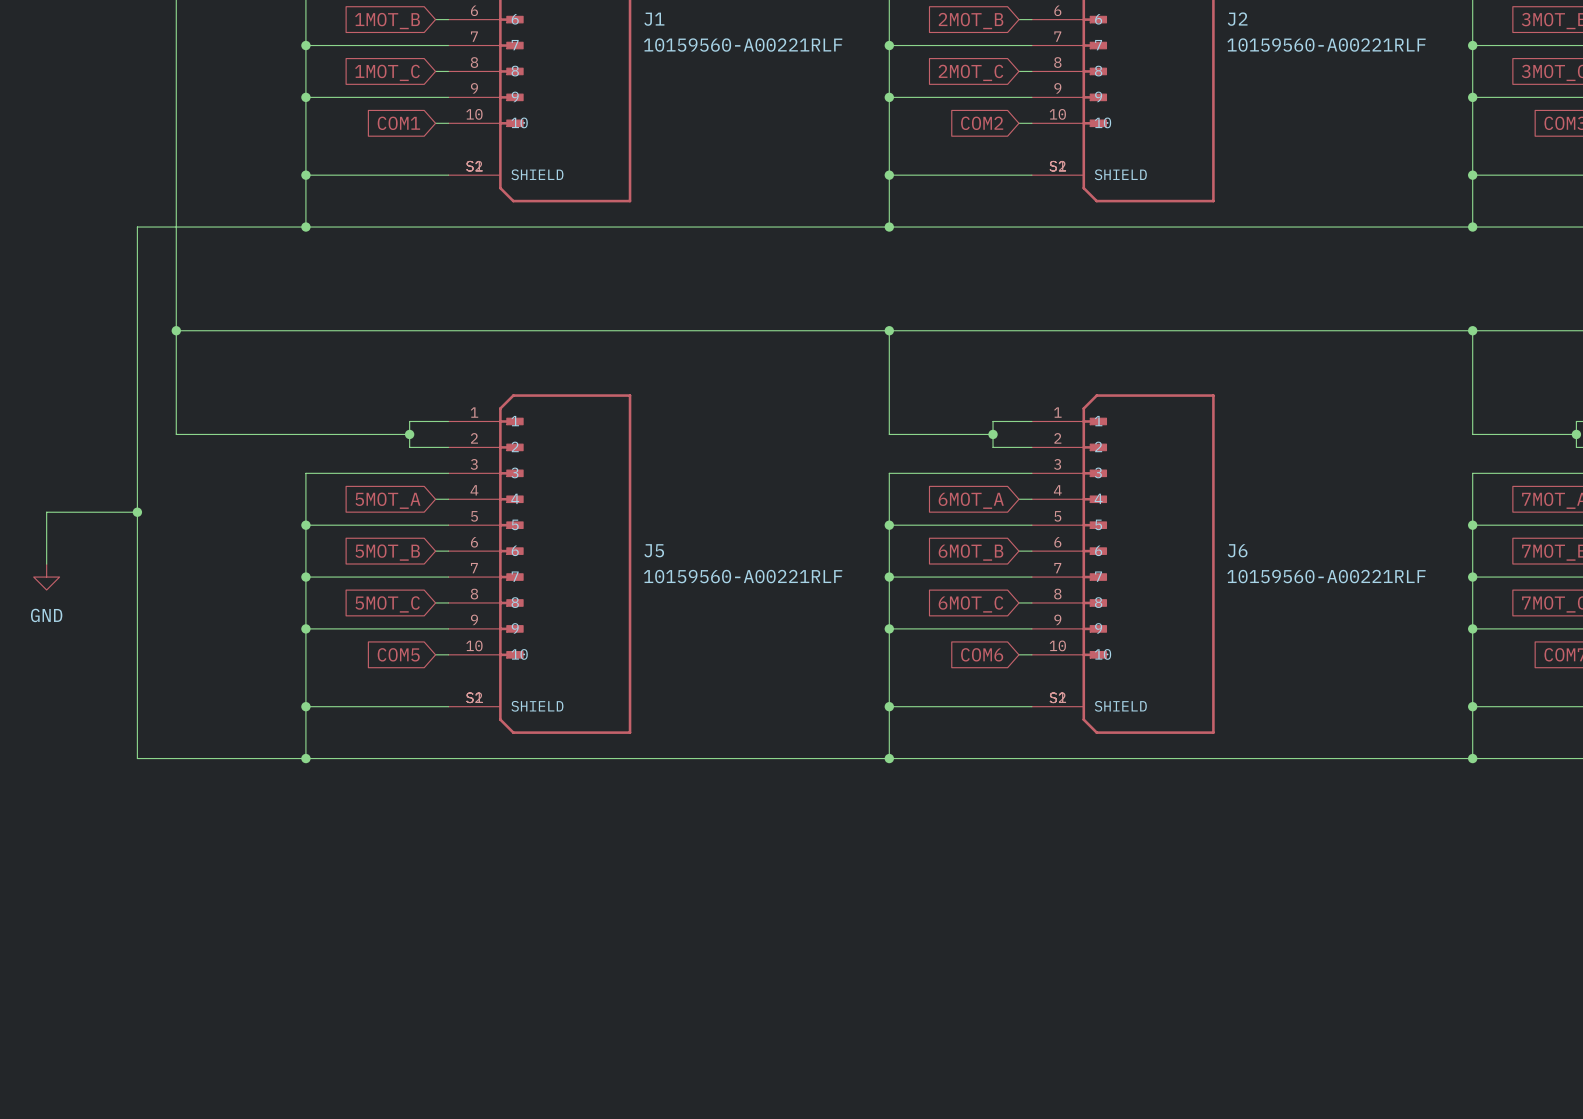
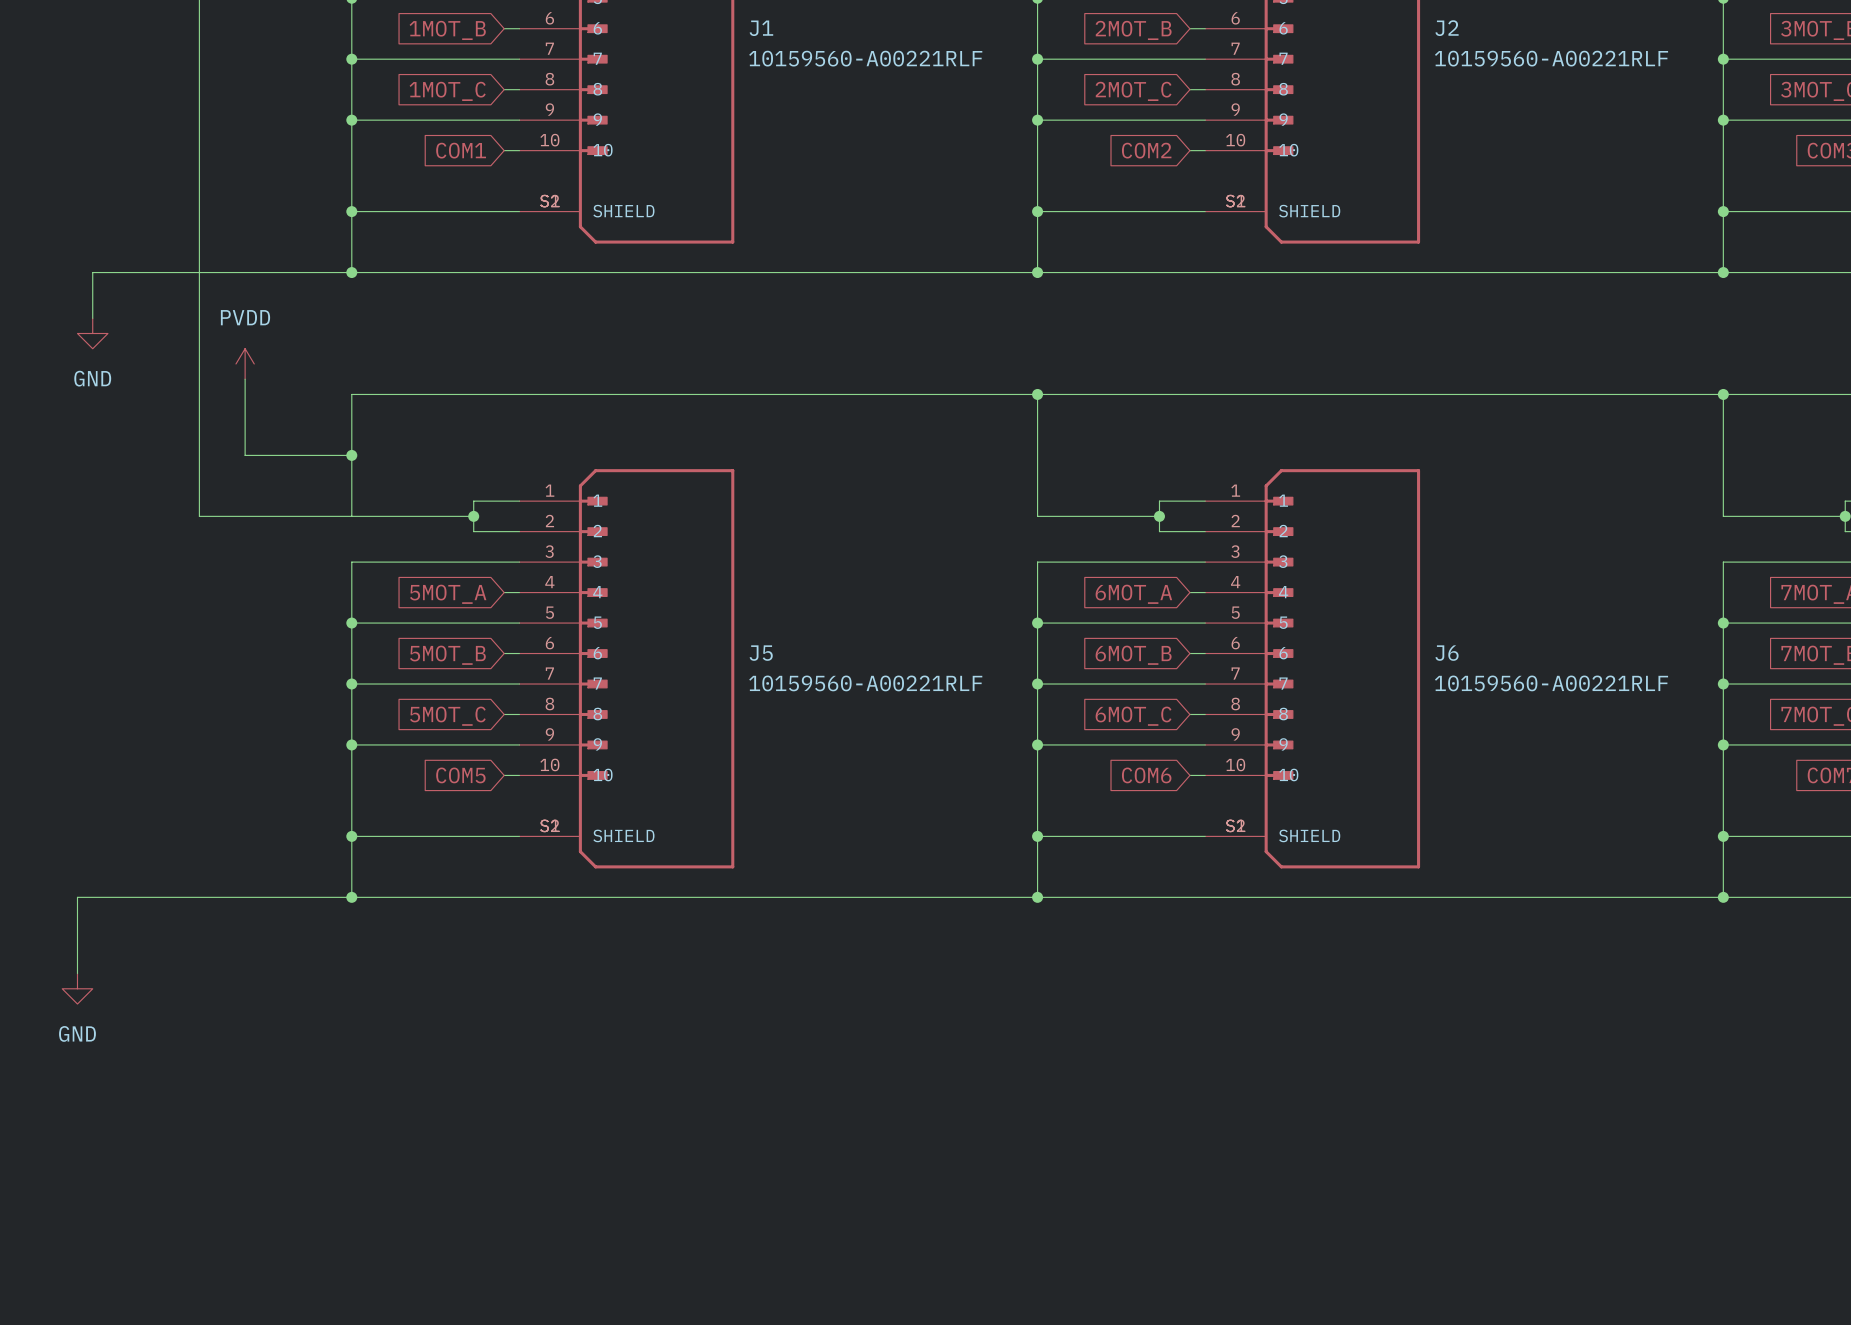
wire: (137, 227) (137, 758) -> (153, 272) (92, 272) (92, 318)
power symbol: none -> GND (92, 333)
power symbol: none -> PVDD (245, 363)
wire: none -> (245, 379) (245, 455) (351, 455)
wire: (176, 330) (305, 330) -> (351, 516) (351, 394)
junction: (176, 330) -> none
junction: none -> (351, 455)
wire: (137, 512) (46, 512) (46, 564) -> none
junction: (137, 512) -> none
power symbol: GND (46, 577) -> none
wire: none -> (153, 897) (77, 897) (77, 973)
power symbol: none -> GND (77, 988)

